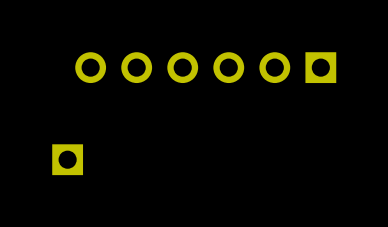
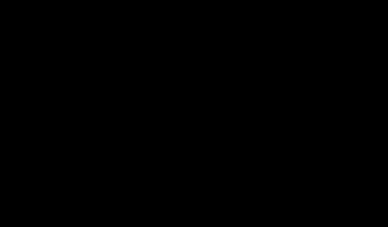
part: (205, 67) -> none
part: (67, 159) -> none

